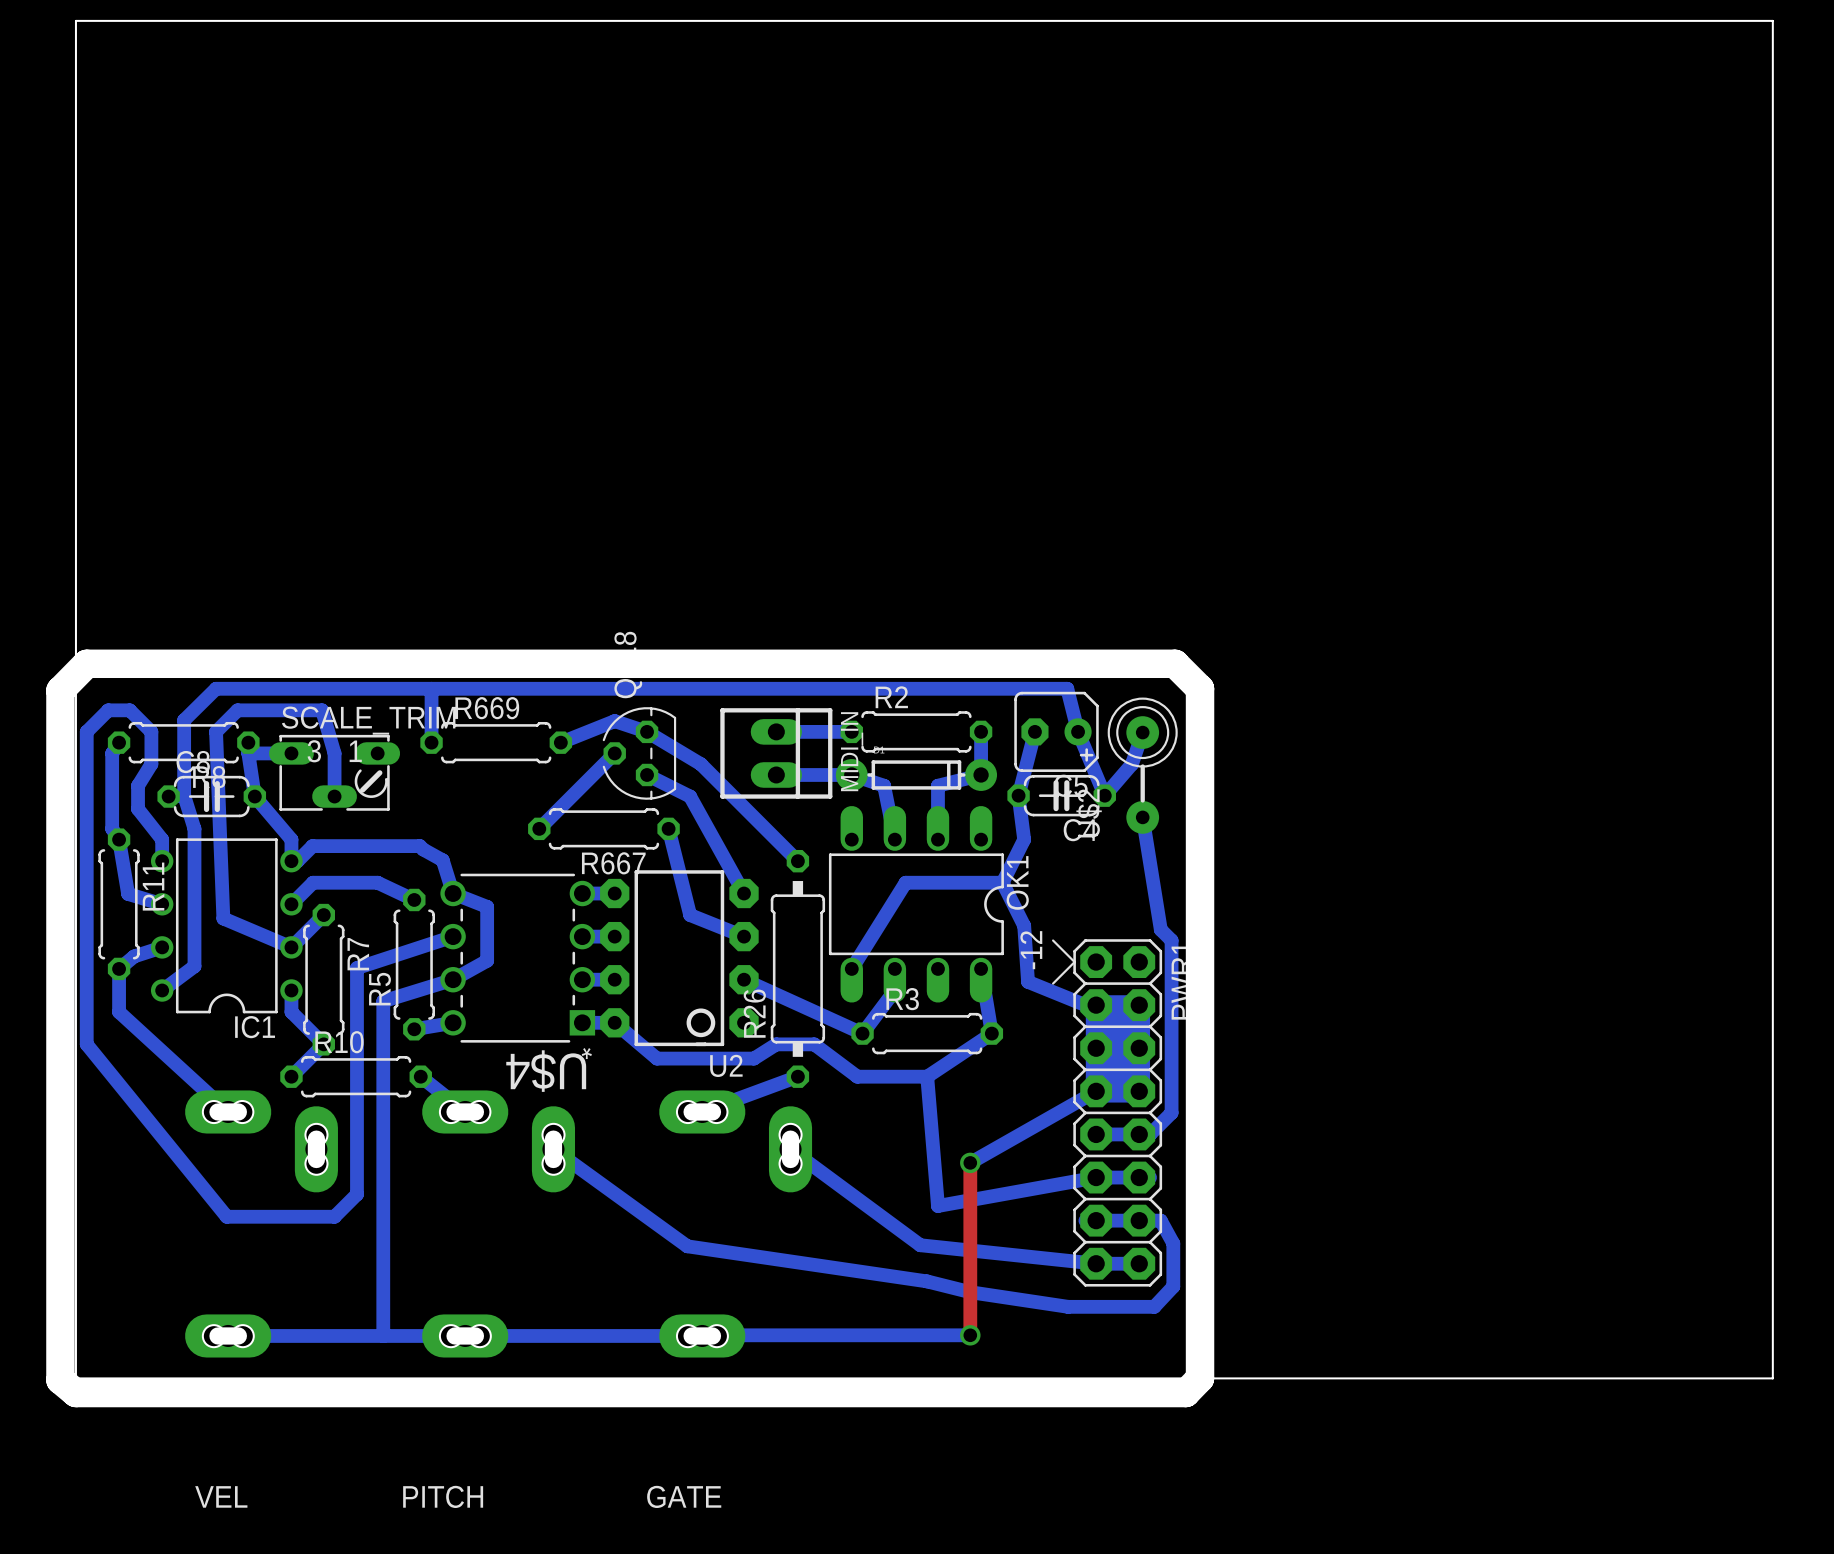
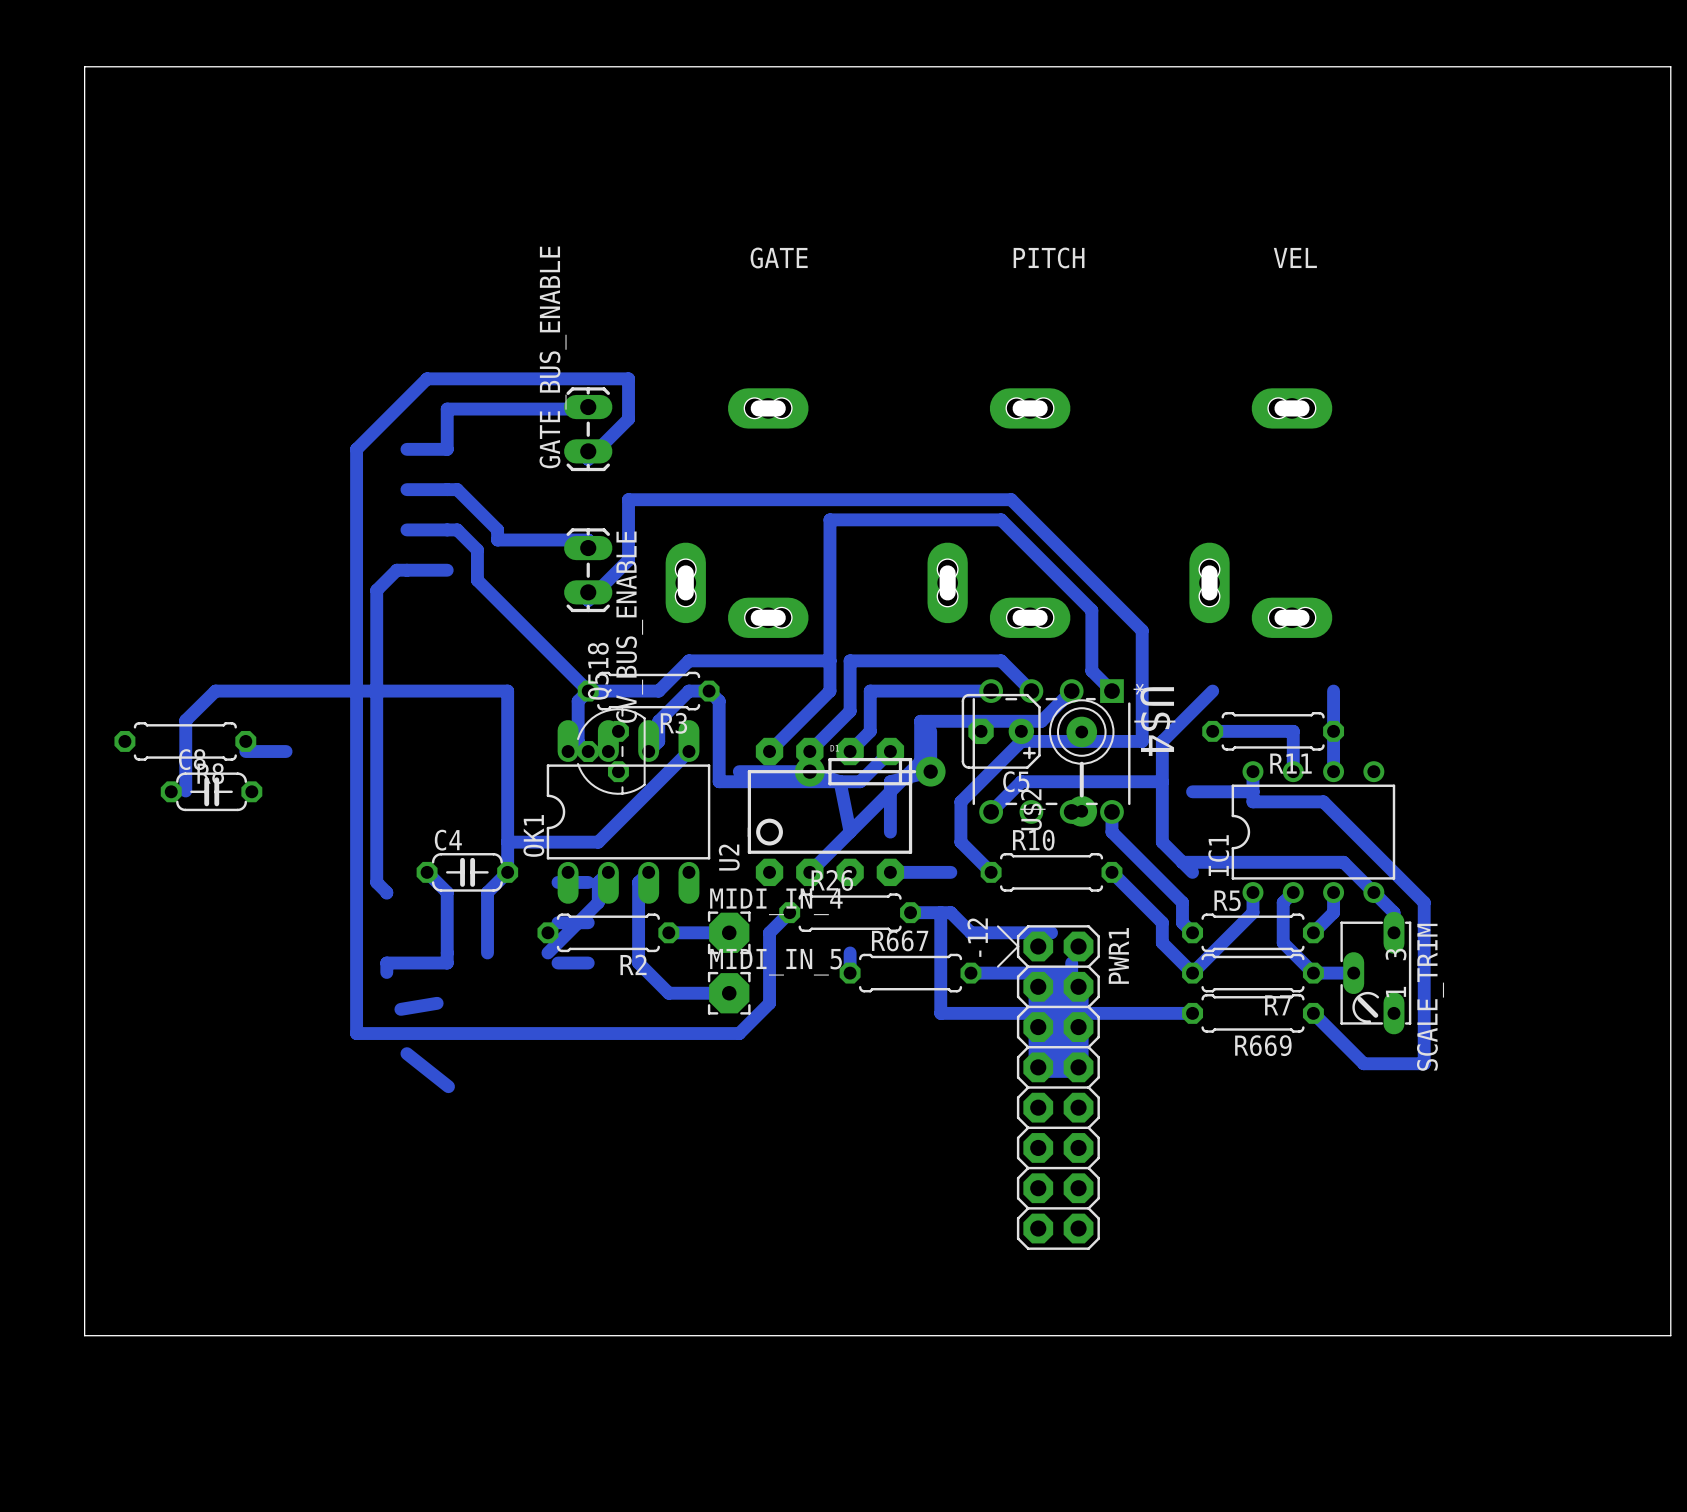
bottom track: none -> (588, 407) (588, 409) (447, 409) (447, 449) (406, 449)
GATE_BUS_ENABLE: none -> (588, 429)
bottom track: none -> (588, 451) (588, 459) (628, 419) (628, 378) (427, 378) (356, 449) (356, 1033) (739, 1033) (769, 1003) (769, 932) (789, 912)
bottom track: none -> (406, 489) (457, 489) (497, 529) (497, 540) (588, 540) (588, 548)
GATE: none -> (737, 513)
PITCH: none -> (998, 513)
VEL: none -> (1260, 513)
bottom track: none -> (406, 529) (457, 529) (477, 550) (477, 580) (588, 691) (578, 701) (578, 741) (568, 751)
bottom track: none -> (447, 570) (396, 570) (376, 590) (376, 882) (386, 893)
CV_BUS_ENABLE: none -> (588, 570)
bottom track: none -> (588, 592) (588, 600) (628, 560) (628, 499) (1011, 499) (1142, 630) (1142, 741) (1021, 741) (960, 801) (960, 842) (991, 872)
bottom track: none -> (829, 660) (688, 660) (658, 691)
board edge: (86, 663) (1175, 663) (1200, 688) (1200, 1378) (1185, 1393) (75, 1393) (60, 1380) (60, 690) (86, 663) -> none
bottom track: (431, 688) (431, 742) -> none
bottom track: (528, 688) (614, 688) -> (507, 691) (507, 872) (487, 892) (487, 952)
bottom track: (690, 688) (722, 688) -> (648, 751) (658, 741) (658, 721) (688, 691)
bottom track: (744, 688) (916, 688) -> (709, 691) (719, 701) (719, 781) (860, 781) (890, 751)
bottom track: none -> (870, 691) (870, 731) (850, 751)
bottom track: (1045, 688) (1067, 688) (1078, 731) (1104, 795) (1131, 764) (1142, 732) -> none
bottom track: none -> (1031, 691) (1001, 660) (850, 660) (850, 711) (809, 751)
bottom track: none -> (1071, 691) (1041, 721) (920, 721) (920, 761) (809, 872)
bottom track: none -> (1111, 691) (1091, 670) (1091, 610) (1001, 519) (829, 519) (829, 691) (769, 751)
bottom track: none -> (1212, 691) (1162, 741) (1162, 842) (1192, 872)
bottom track: none -> (1333, 691) (1333, 771)
R2 name position: R2 (891, 697) -> R2 (633, 964)
R669 name position: R669 (487, 708) -> R669 (1263, 1045)
bottom track: (776, 731) (851, 731) -> none
R2 position: (916, 731) -> (608, 932)
bottom track: (1034, 731) (1018, 795) (1024, 839) (1002, 882) (1024, 925) (1028, 981) (1085, 1005) (1139, 1005) -> none
bottom track: none -> (1212, 731) (1293, 731) (1293, 771)
bottom track: (119, 742) (112, 753) (112, 828) (119, 839) (128, 893) (162, 904) -> none
bottom track: (248, 742) (254, 796) (291, 839) (291, 861) (297, 861) (312, 846) (419, 846) (442, 860) (453, 893) (487, 906) (487, 960) (453, 979) (383, 1001) (383, 1335) -> none
R669 position: (496, 742) -> (1252, 1013)
bottom track: (560, 742) (614, 721) (647, 731) (700, 764) (797, 861) -> none
bottom track: (614, 753) (539, 828) -> none
bottom track: none -> (688, 751) (598, 842) (507, 842)
MIDI_IN: (776, 753) -> none
SCALE_TRIM: (334, 772) -> none
bottom track: (647, 774) (690, 796) (744, 893) -> none
bottom track: none -> (1252, 771) (1252, 801) (1323, 801) (1424, 902) (1424, 1063) (1363, 1063) (1313, 1013)
bottom track: none -> (1162, 781) (1021, 781) (991, 811)
C4 rotation: 0° (1061, 795) -> 180° (467, 872)
C4 position: (1061, 795) -> (467, 872)
bottom track: (168, 796) (184, 795) (194, 828) (194, 966) (162, 990) -> none
bottom track: (334, 796) (334, 753) (322, 710) (237, 710) (216, 731) (223, 918) (291, 947) (323, 915) -> none
bottom track: none -> (1192, 791) (1252, 791)
bottom track: (1142, 817) (1160, 929) (1171, 940) (1171, 1112) (1150, 1134) (1096, 1134) -> none
bottom track: none -> (1111, 811) (1111, 832) (1182, 902) (1182, 922) (1192, 932)
R667 position: (603, 828) -> (910, 973)
bottom track: (668, 828) (690, 915) (744, 936) -> none
R26 footprint: [770, 849, 826, 1088] -> [779, 893, 922, 933]
bottom track: (162, 861) (162, 839) (138, 809) (138, 785) (151, 764) (151, 731) (129, 710) (108, 710) (86, 731) (86, 1044) (226, 1216) (334, 1216) (356, 1194) (356, 968) (453, 936) -> none
R667 name position: R667 (613, 863) -> R667 (900, 940)
bottom track: none -> (1182, 862) (1343, 862) (1393, 912) (1393, 932)
bottom track: none -> (427, 872) (447, 892) (447, 963) (386, 963) (386, 972)
bottom track: none -> (608, 872) (598, 882) (598, 902) (547, 952)
bottom track: none -> (648, 872) (638, 882) (638, 963) (668, 993) (729, 993)
bottom track: (937, 882) (905, 882) (851, 968) -> none
bottom track: none -> (1111, 872) (1162, 922) (1162, 942) (1192, 973) (1252, 912) (1252, 892)
bottom track: (414, 899) (377, 882) (313, 882) (291, 904) -> none
R11 rotation: 0° (119, 904) -> 90° clockwise (1273, 731)
R11 position: (119, 904) -> (1273, 731)
OK1 rotation: 0° (916, 904) -> 180° (628, 811)
OK1 position: (916, 904) -> (628, 811)
bottom track: none -> (1293, 892) (1283, 902) (1283, 942) (1313, 973) (1353, 973)
bottom track: none -> (1333, 892) (1333, 912) (1313, 932)
IC1 rotation: 0° (226, 925) -> 90° clockwise (1313, 832)
IC1 position: (226, 925) -> (1313, 832)
bottom track: none -> (910, 912) (950, 912) (970, 932) (1051, 932)
bottom track: none -> (940, 912) (940, 1013) (1192, 1013)
bottom track: (162, 947) (134, 956) (119, 968) (119, 1012) (228, 1111) -> none
bottom track: none -> (668, 932) (729, 932)
MIDI_IN_4: none -> (729, 932)
U$4 rotation: 0° (517, 958) -> 90° counterclockwise (1051, 751)
U$4 position: (517, 958) -> (1051, 751)
U2 rotation: 0° (679, 958) -> 90° clockwise (829, 811)
U2 position: (679, 958) -> (829, 811)
R5 rotation: 0° (414, 964) -> 90° clockwise (1252, 932)
R5 position: (414, 964) -> (1252, 932)
bottom track: (981, 968) (991, 1033) (927, 1076) -> none
R7 rotation: 0° (323, 979) -> 90° clockwise (1252, 973)
R7 position: (323, 979) -> (1252, 973)
bottom track: (744, 979) (862, 1033) (894, 990) -> none
bottom track: none -> (1071, 963) (1071, 973) (970, 973)
bottom track: (291, 990) (291, 1012) (323, 1044) (291, 1076) -> none
SCALE_TRIM: none -> (1375, 973)
R3 name position: R3 (902, 999) -> R3 (673, 723)
MIDI_IN_5: none -> (729, 993)
R26 name position: R26 (754, 1013) -> R26 (832, 880)
bottom track: (582, 1022) (614, 1022) (656, 1058) (753, 1058) (776, 1044) (814, 1044) (857, 1076) (927, 1076) -> none
R3 position: (927, 1033) -> (648, 691)
R10 position: (356, 1076) -> (1051, 872)
bottom track: (797, 1076) (702, 1111) -> none
bottom track: (927, 1076) (937, 1205) (1096, 1177) (1150, 1177) -> none
bottom track: (1139, 1091) (1096, 1091) (970, 1162) -> none
bottom track: (553, 1149) (687, 1246) (927, 1281) (970, 1292) (1068, 1306) (1154, 1306) (1173, 1286) (1173, 1243) (1160, 1220) (1085, 1220) -> none
bottom track: (790, 1149) (920, 1245) (1096, 1263) (1139, 1263) -> none
top track: (970, 1162) (970, 1335) -> none
via: (970, 1162) -> none
VEL: (261, 1223) -> none
PITCH: (498, 1223) -> none
GATE: (735, 1223) -> none
bottom track: (228, 1335) (702, 1335) -> none
bottom track: (700, 1335) (970, 1335) -> none
via: (970, 1335) -> none

